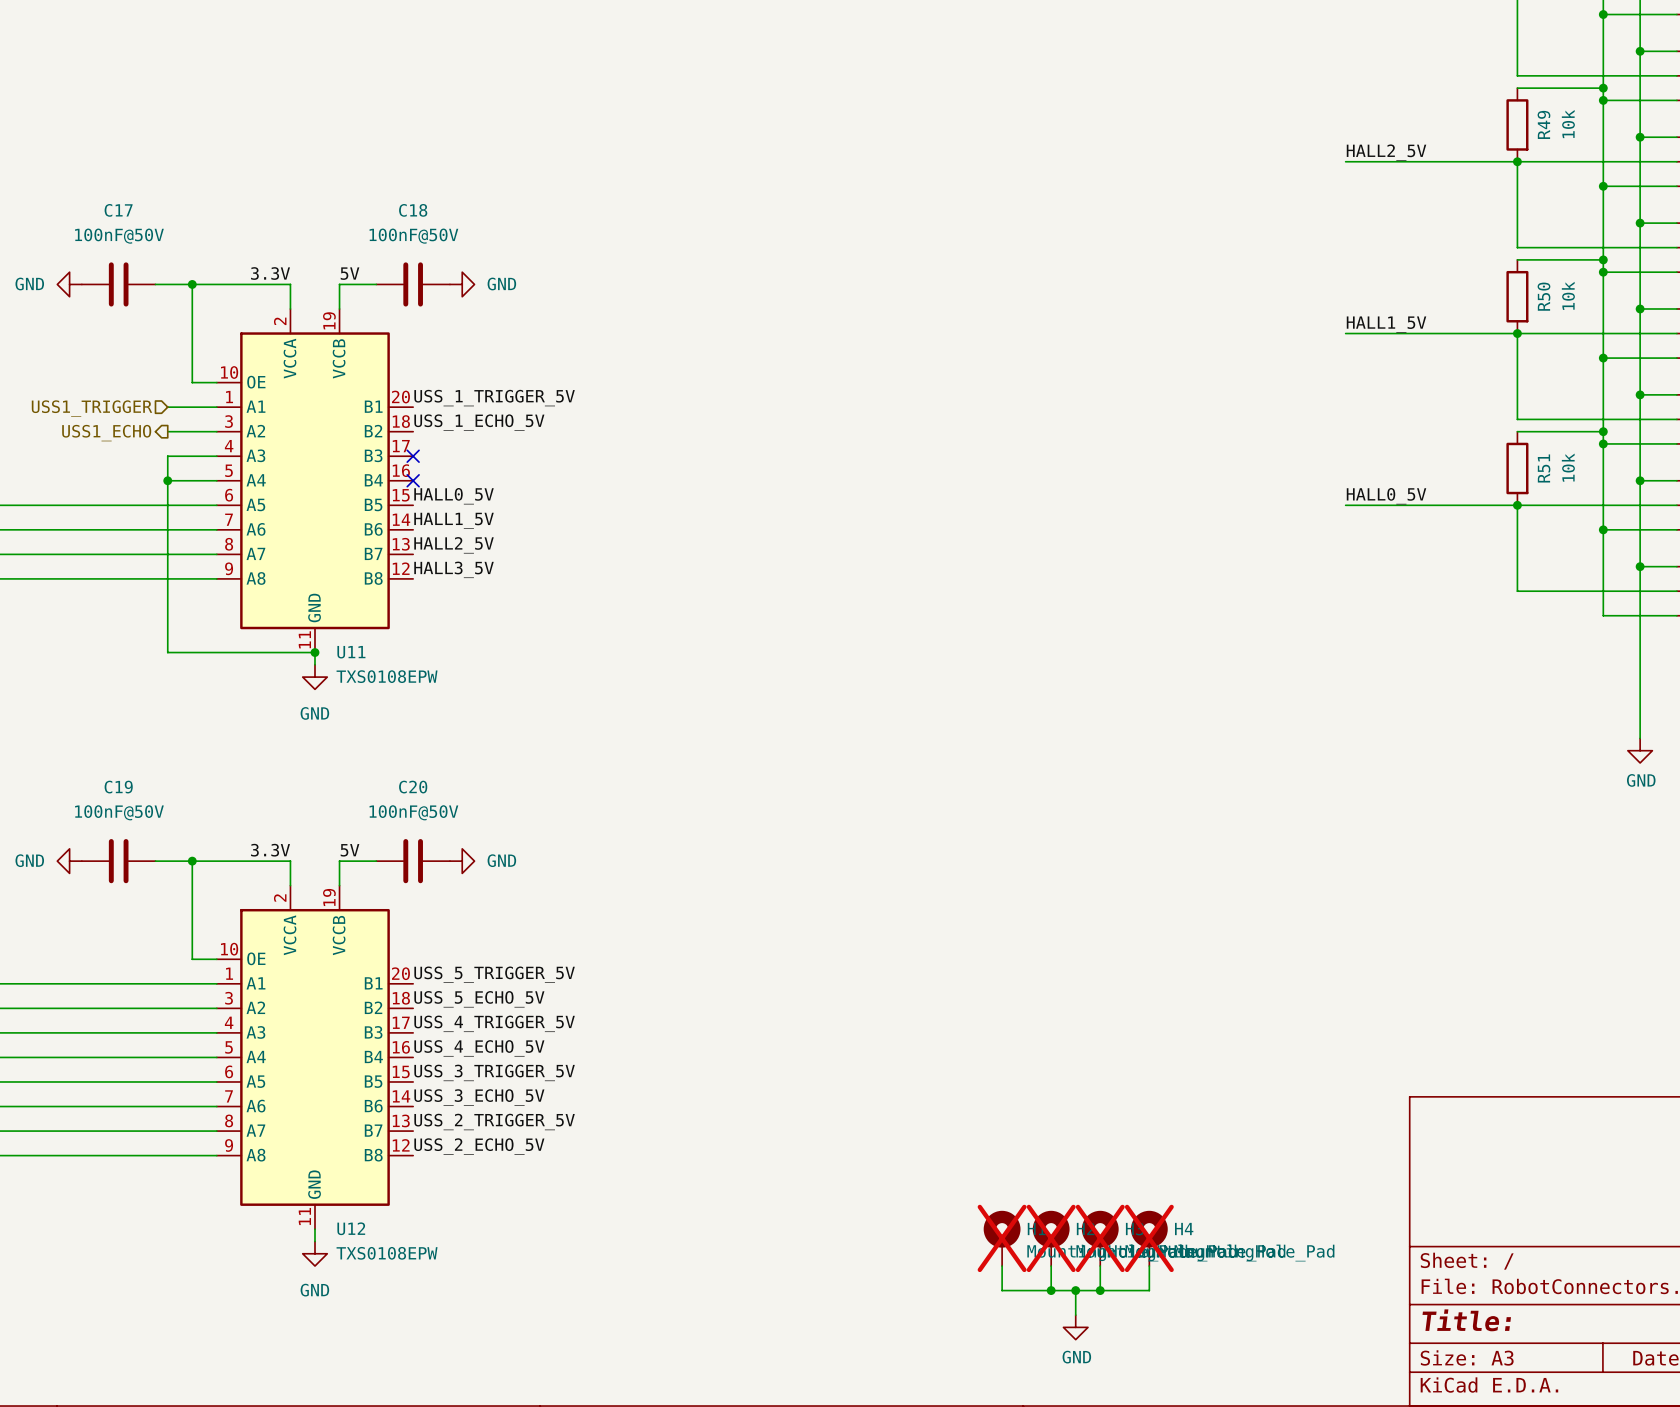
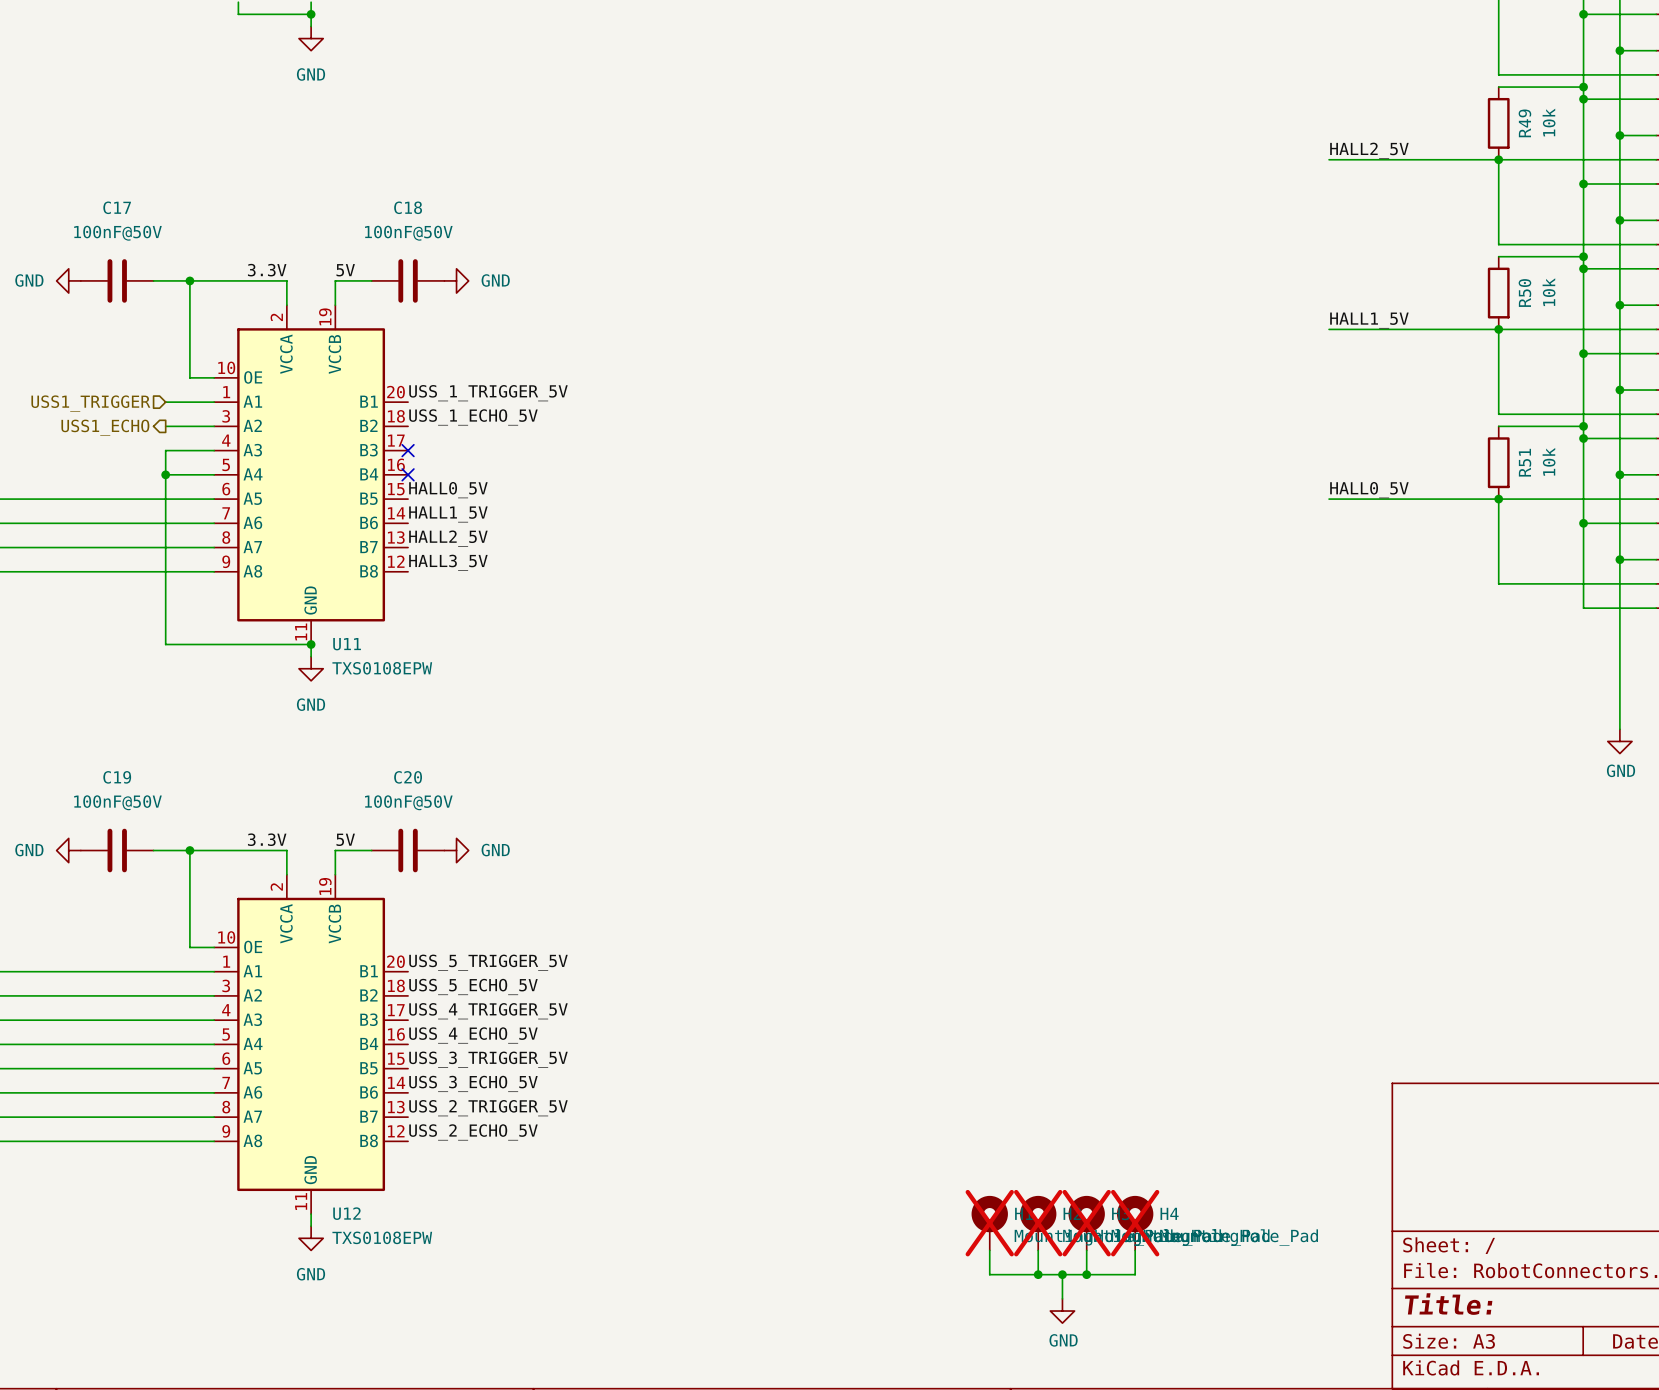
wire: none -> (238, 2) (238, 14) (311, 14)
wire: none -> (311, 2) (311, 26)
junction: none -> (311, 14)
power symbol: none -> GND (311, 38)

